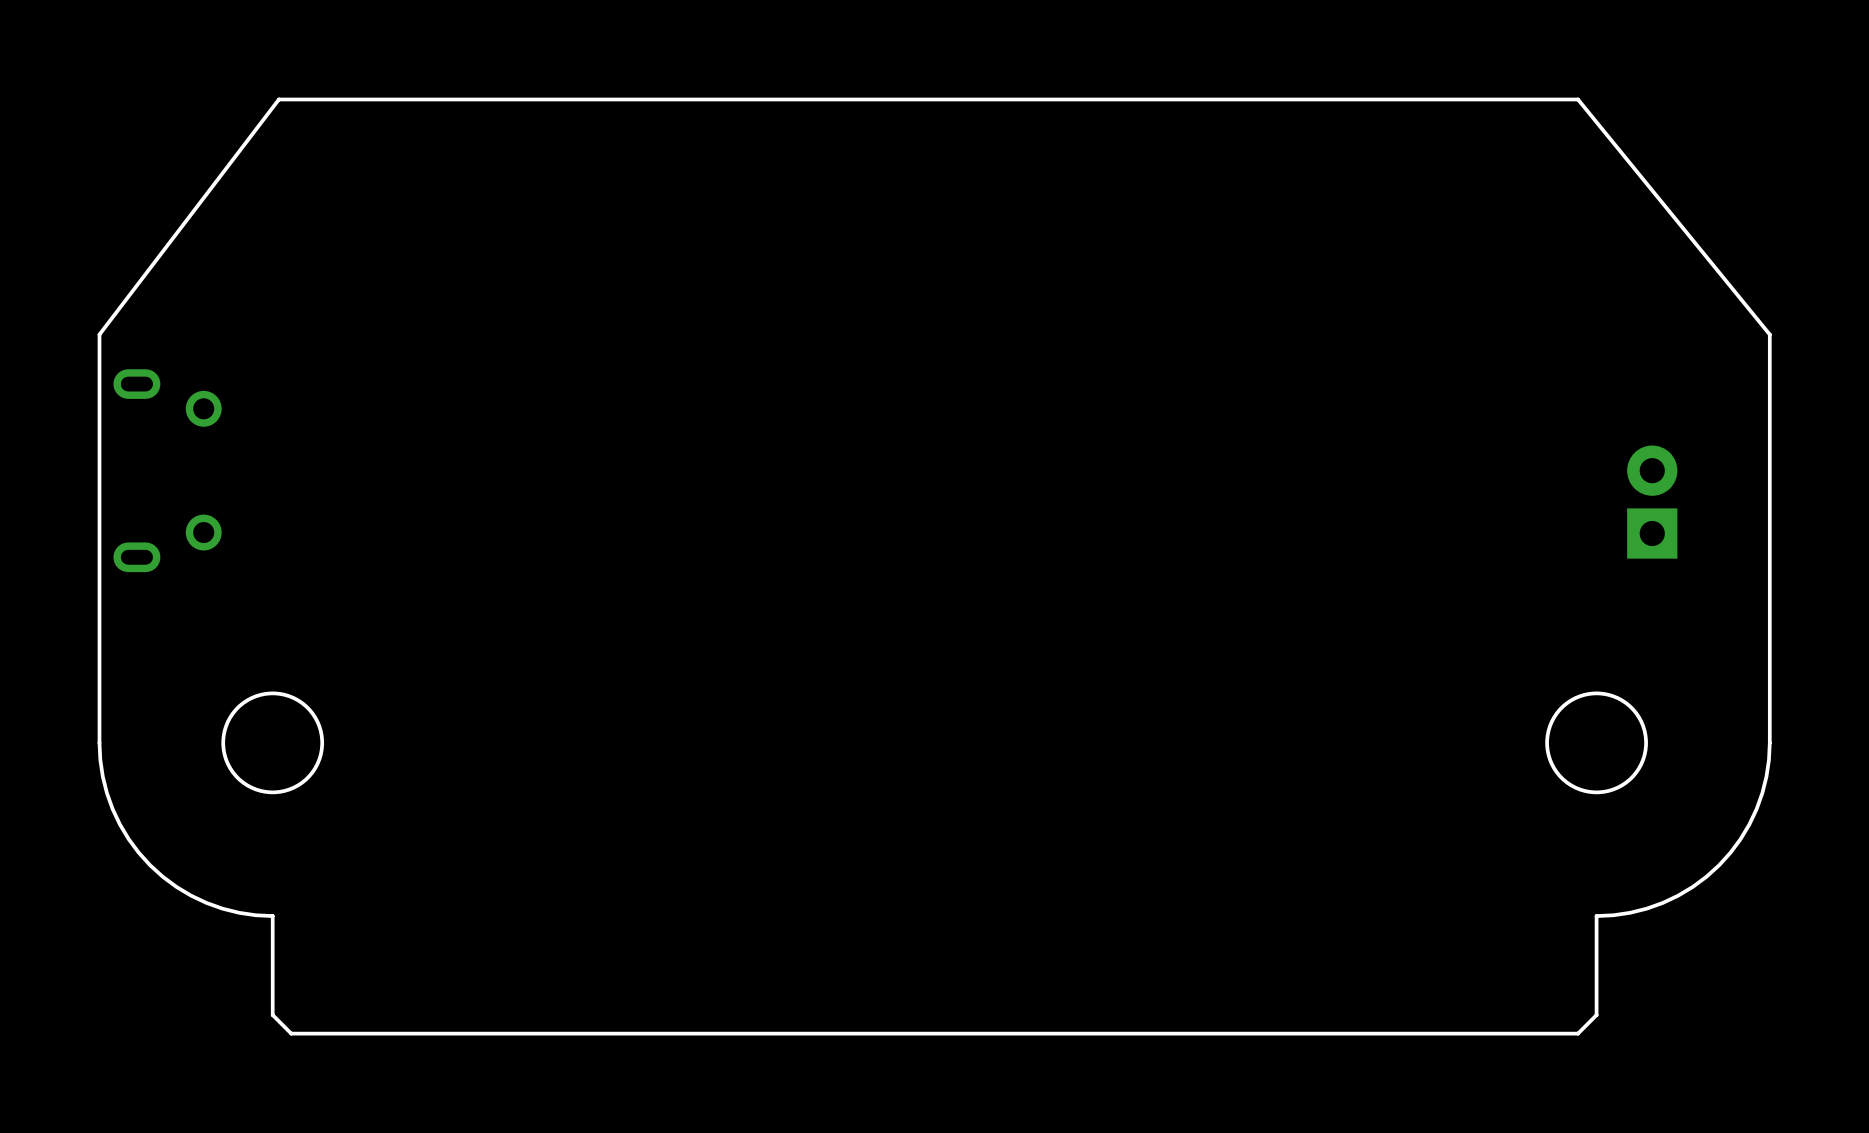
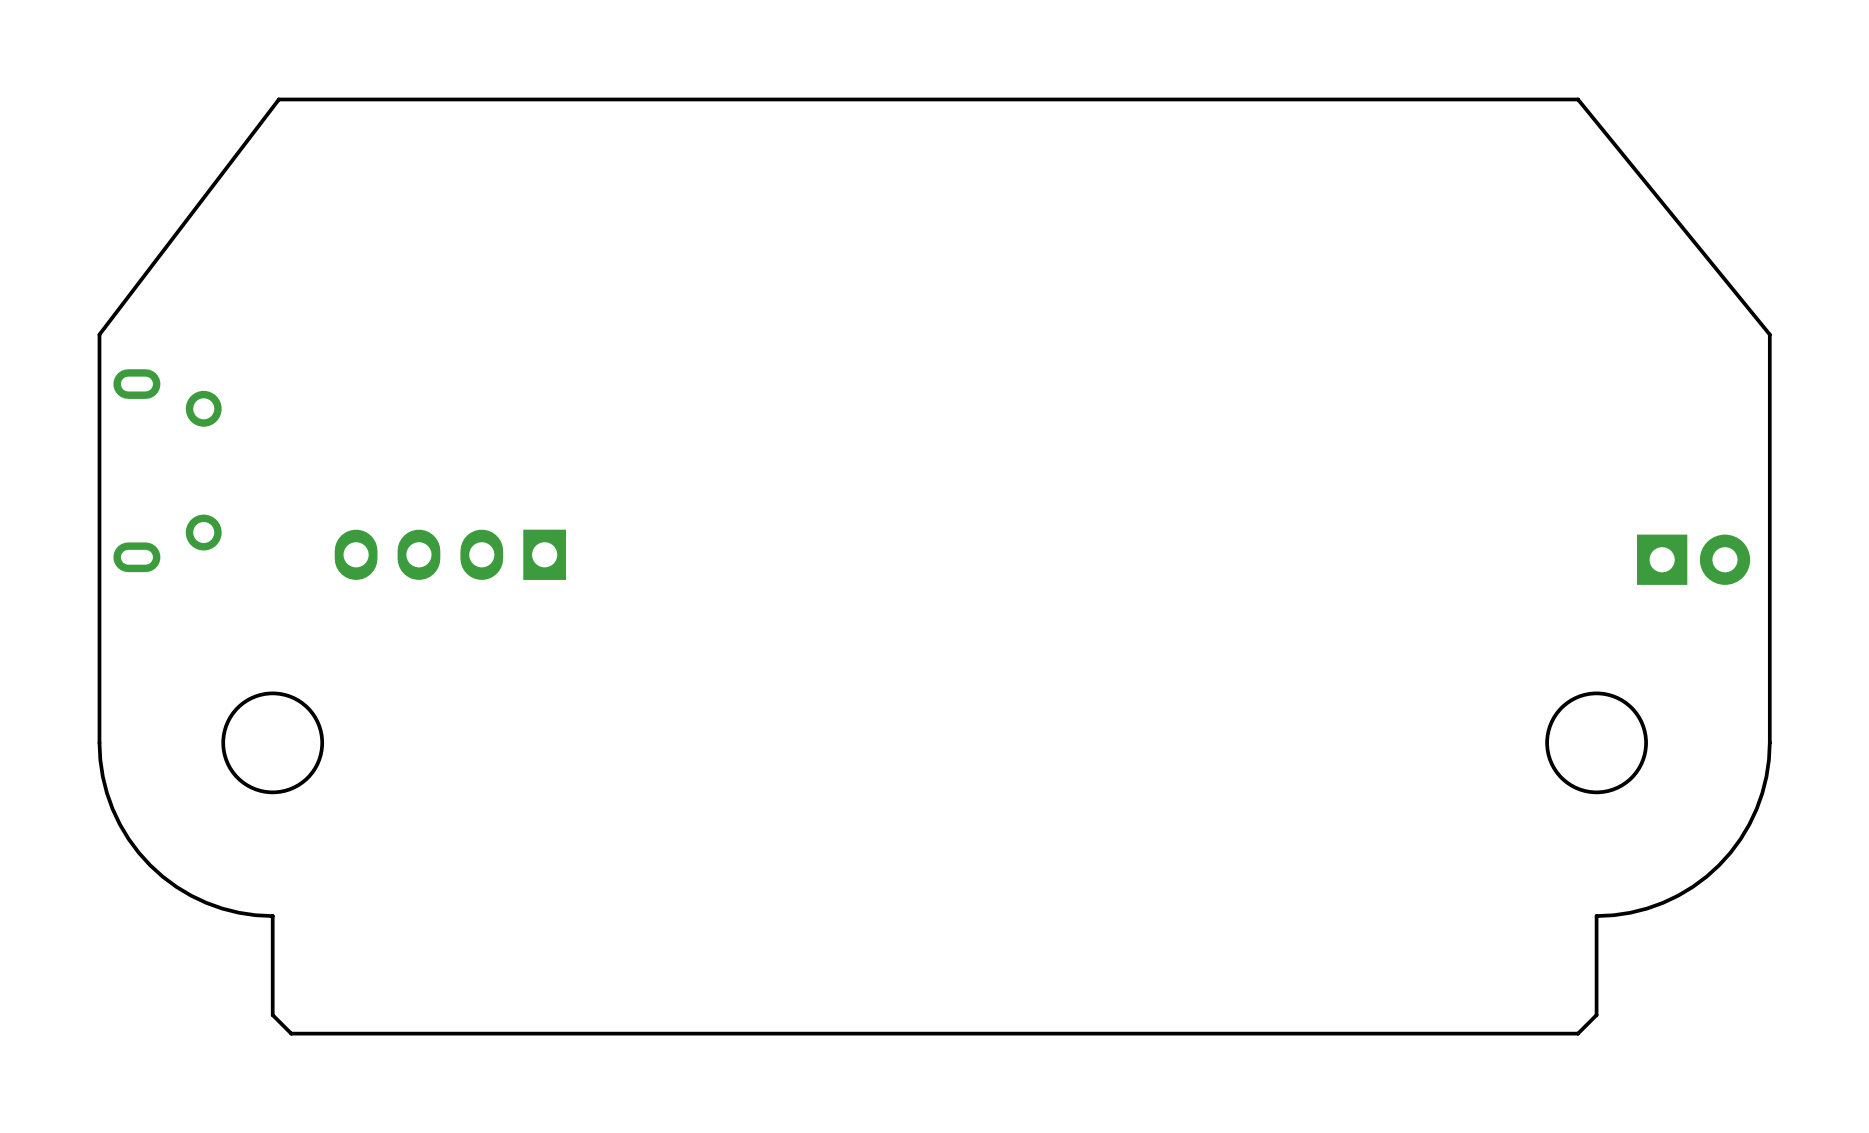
part rotation: 0° (1652, 502) -> 90° clockwise (1693, 559)
part position: (1652, 502) -> (1693, 559)
part: none -> (450, 554)

